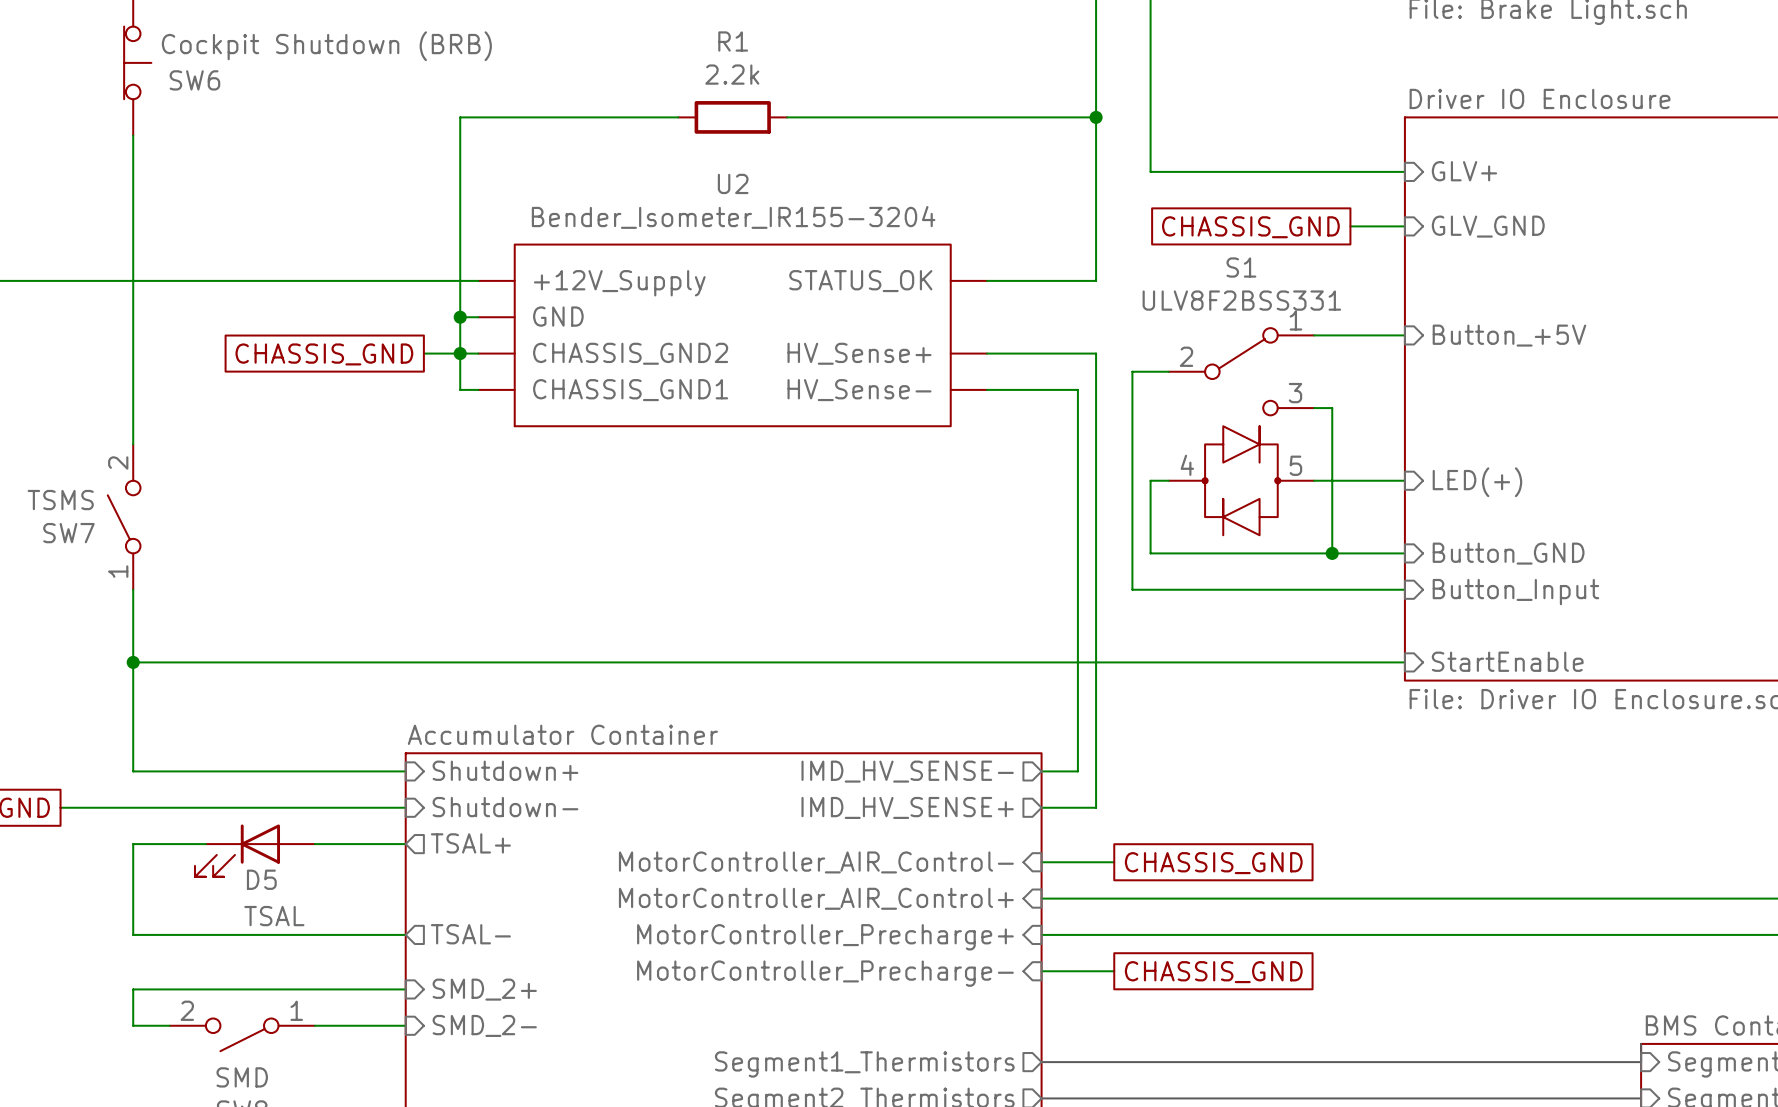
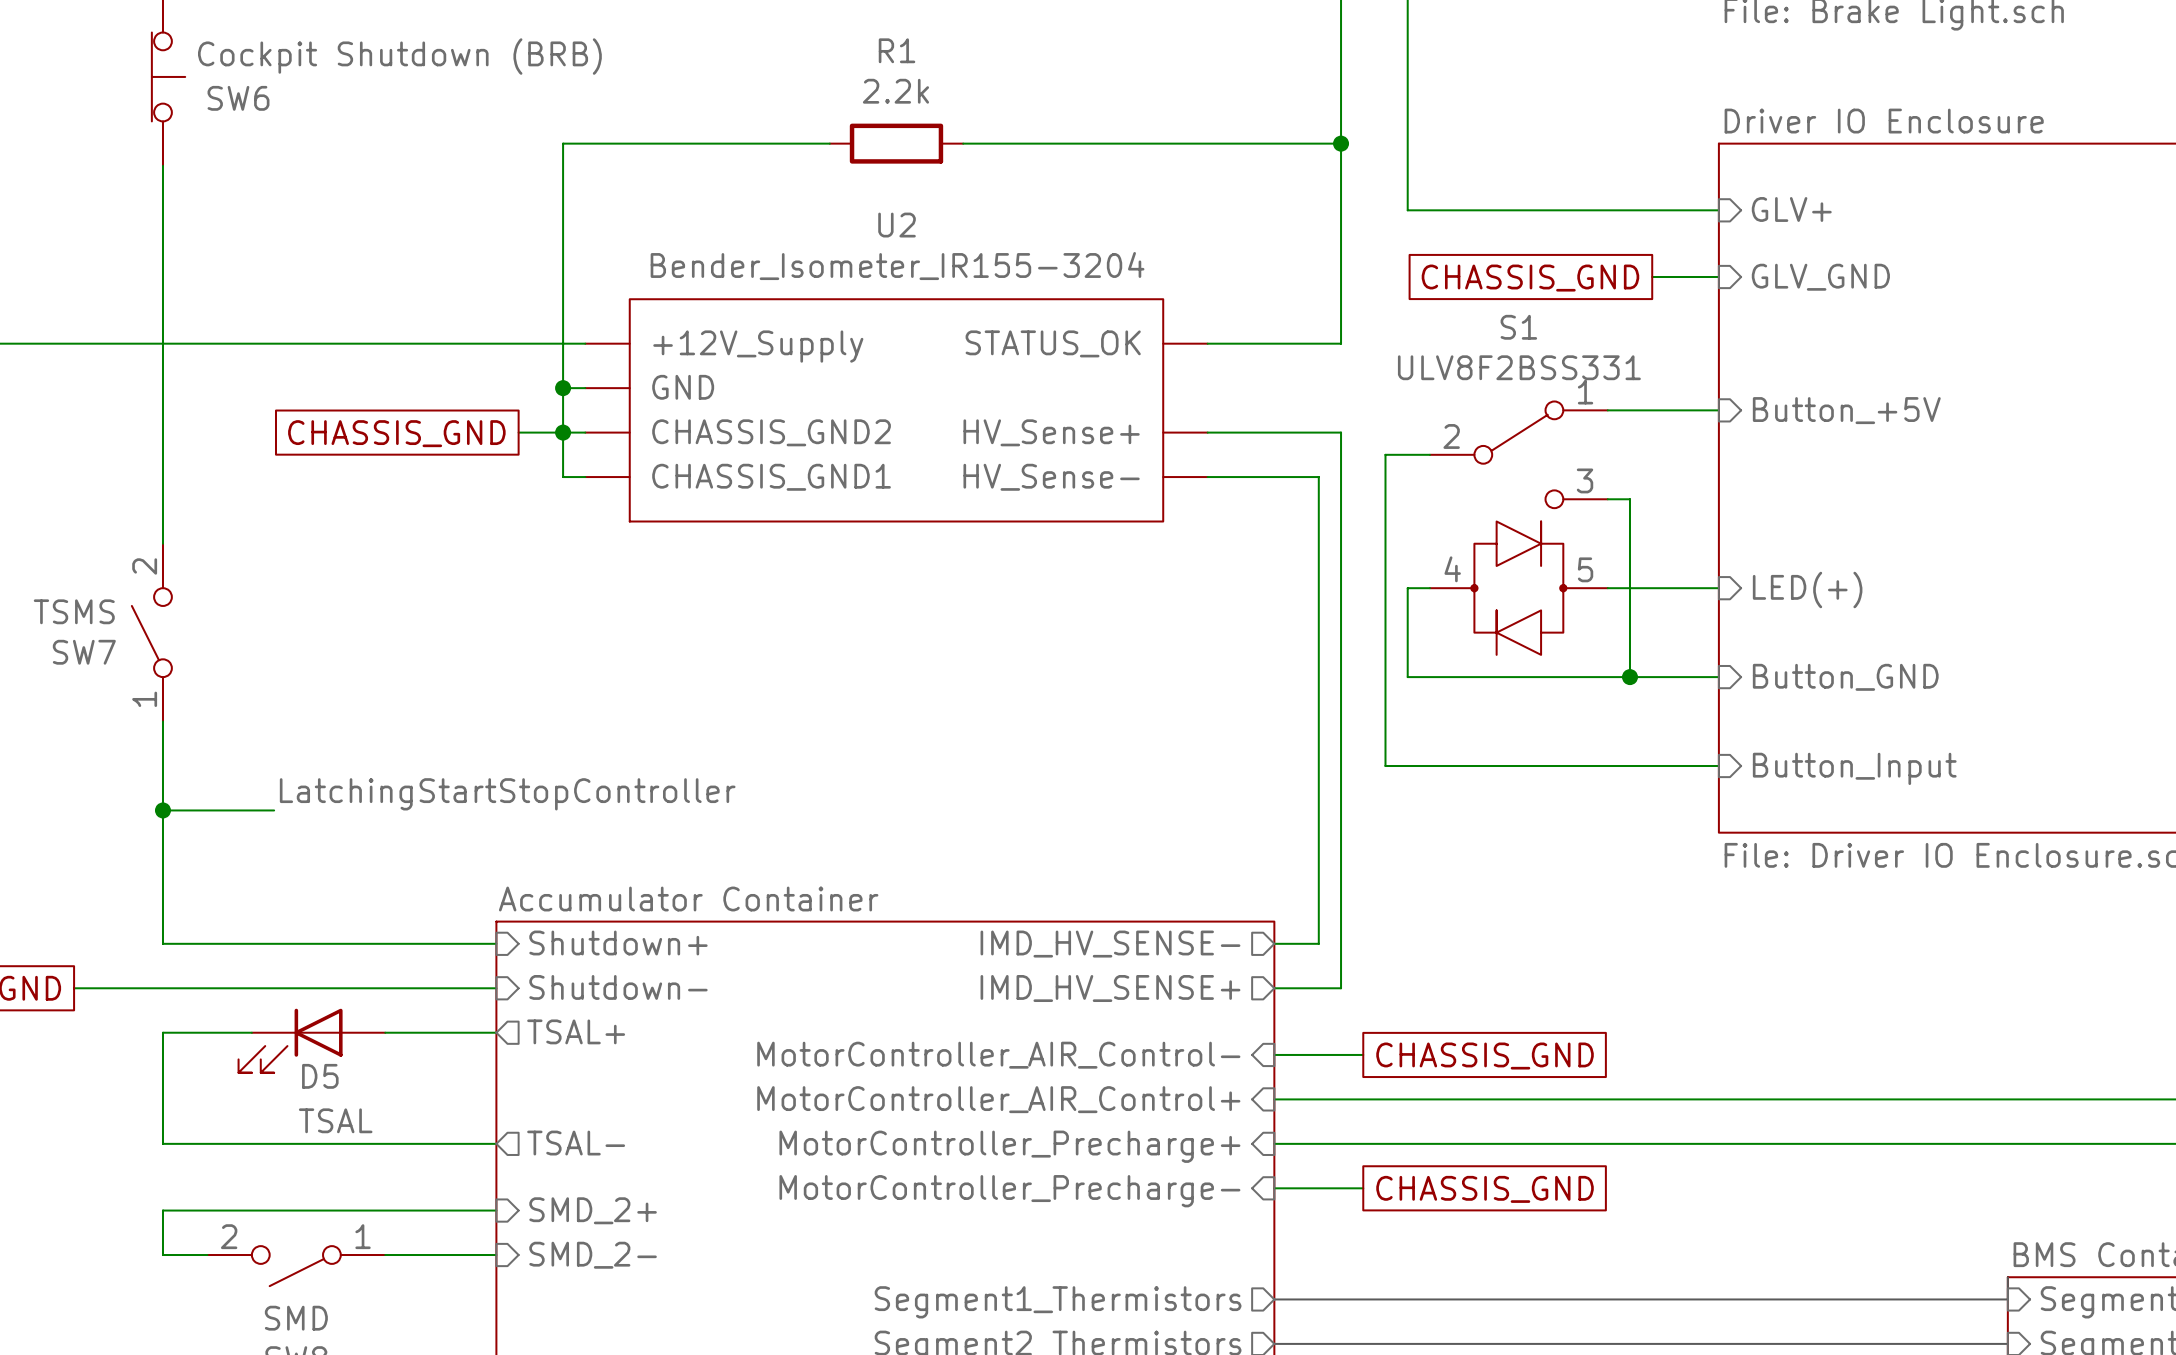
wire: (1132, 589) (1404, 589) -> (1385, 721) (1385, 766) (1718, 766)
sheet pin position: Button_Input (1515, 592) -> Button_Input (1854, 768)
label: none -> LatchingStartStopController (507, 794)
sheet pin: StartEnable (1507, 661) -> none
wire: (224, 662) (1404, 662) -> none

